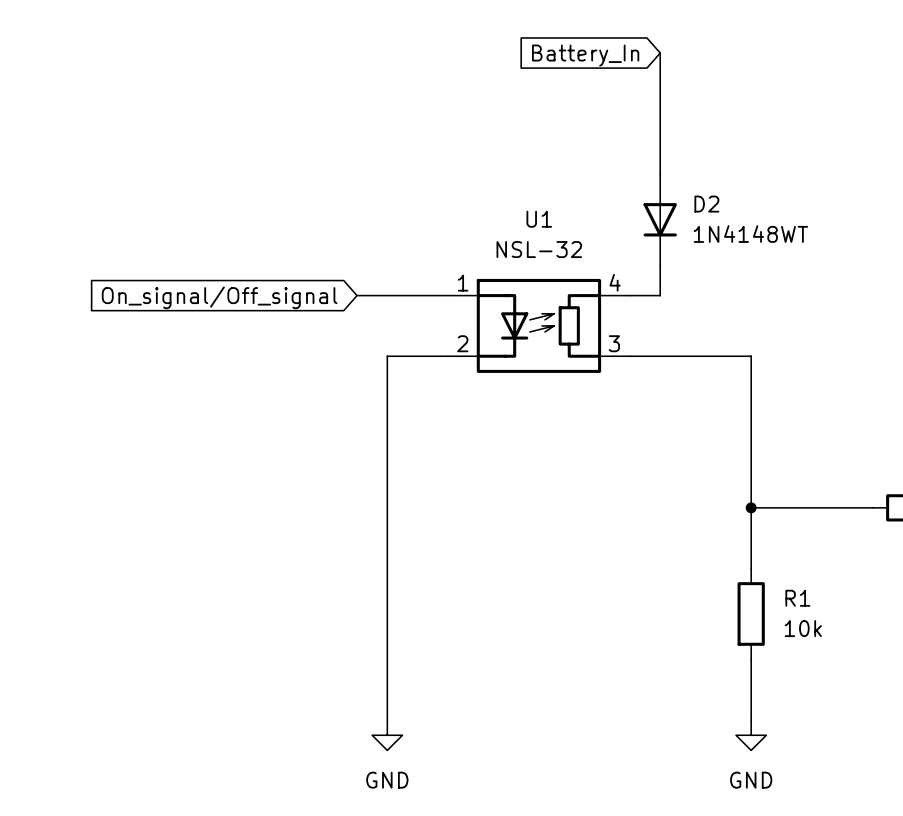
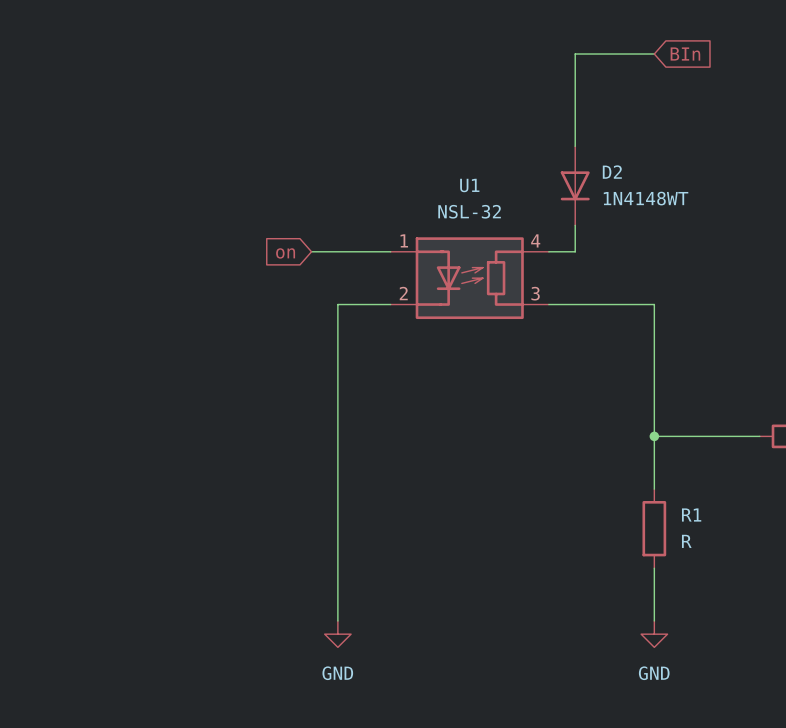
wire: (660, 53) (660, 68) -> (654, 54) (575, 54)
global label: Battery_In (585, 55) -> none
global label: none -> BIn (685, 54)
global label: On_signal/Off_signal (219, 297) -> on (285, 253)
R1 value: 10k (803, 628) -> R (686, 541)

